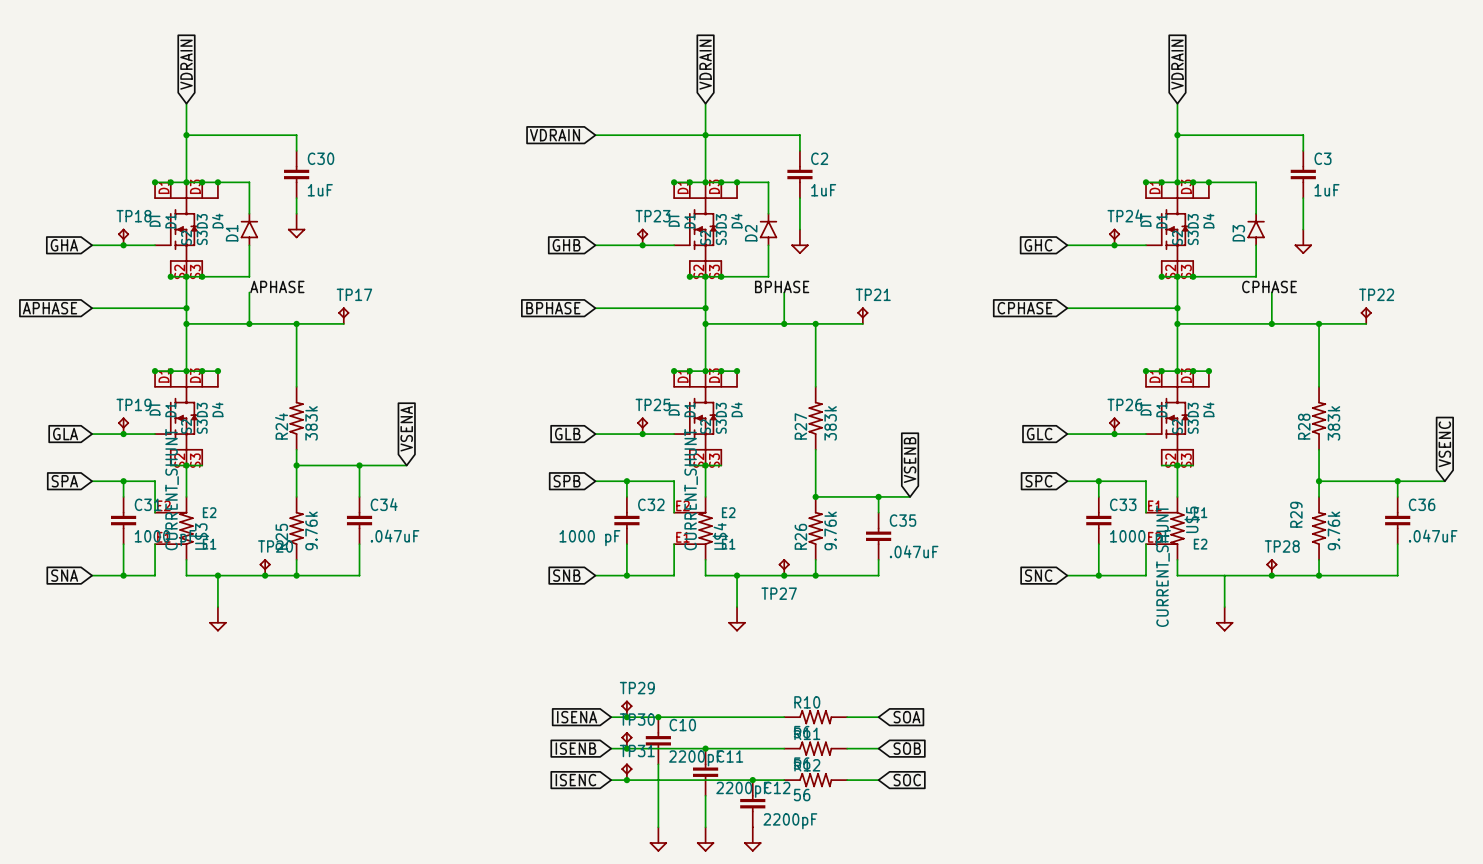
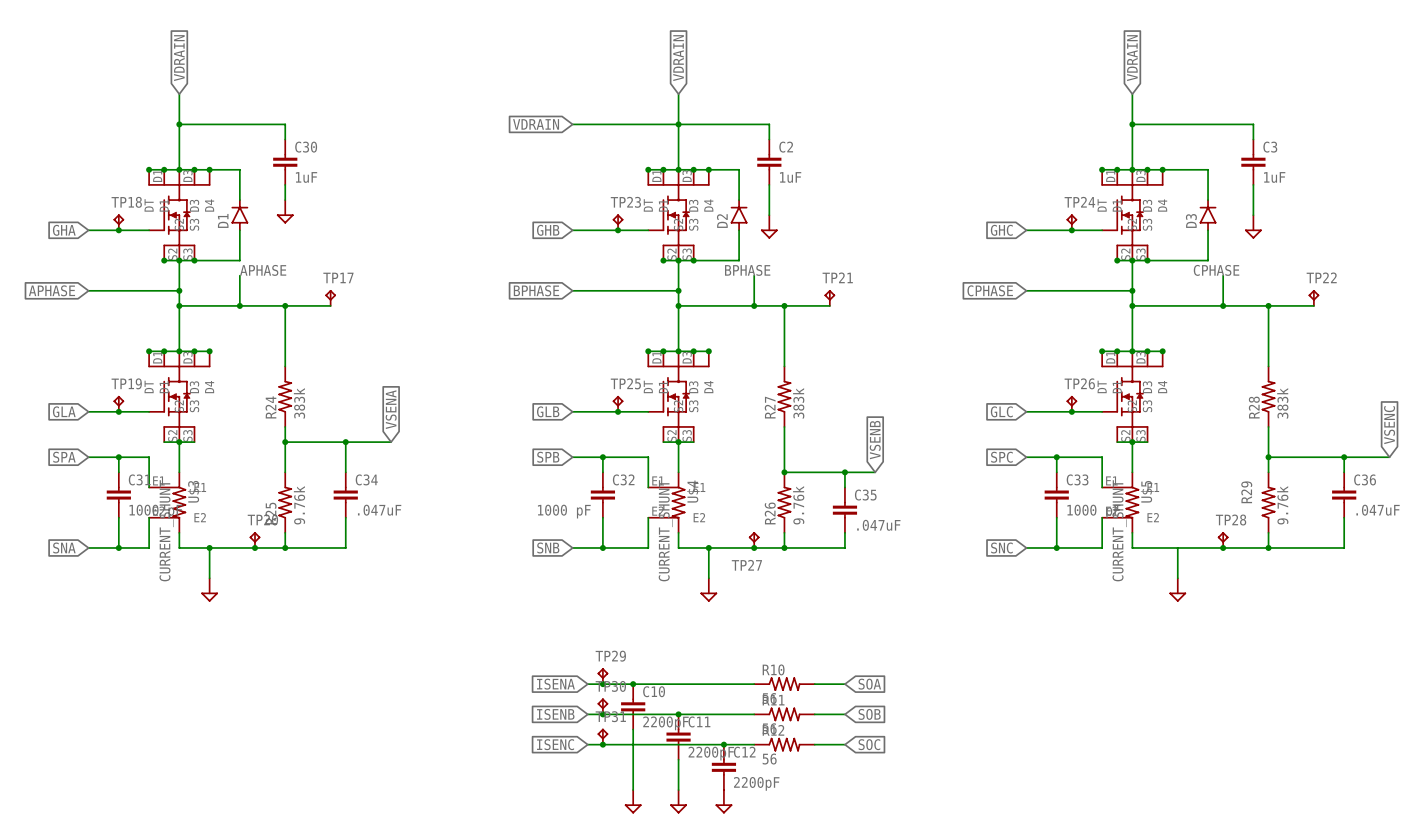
U$3 flip: as is (186, 528) -> up-down (179, 502)
U$4 flip: as is (705, 528) -> up-down (678, 502)

